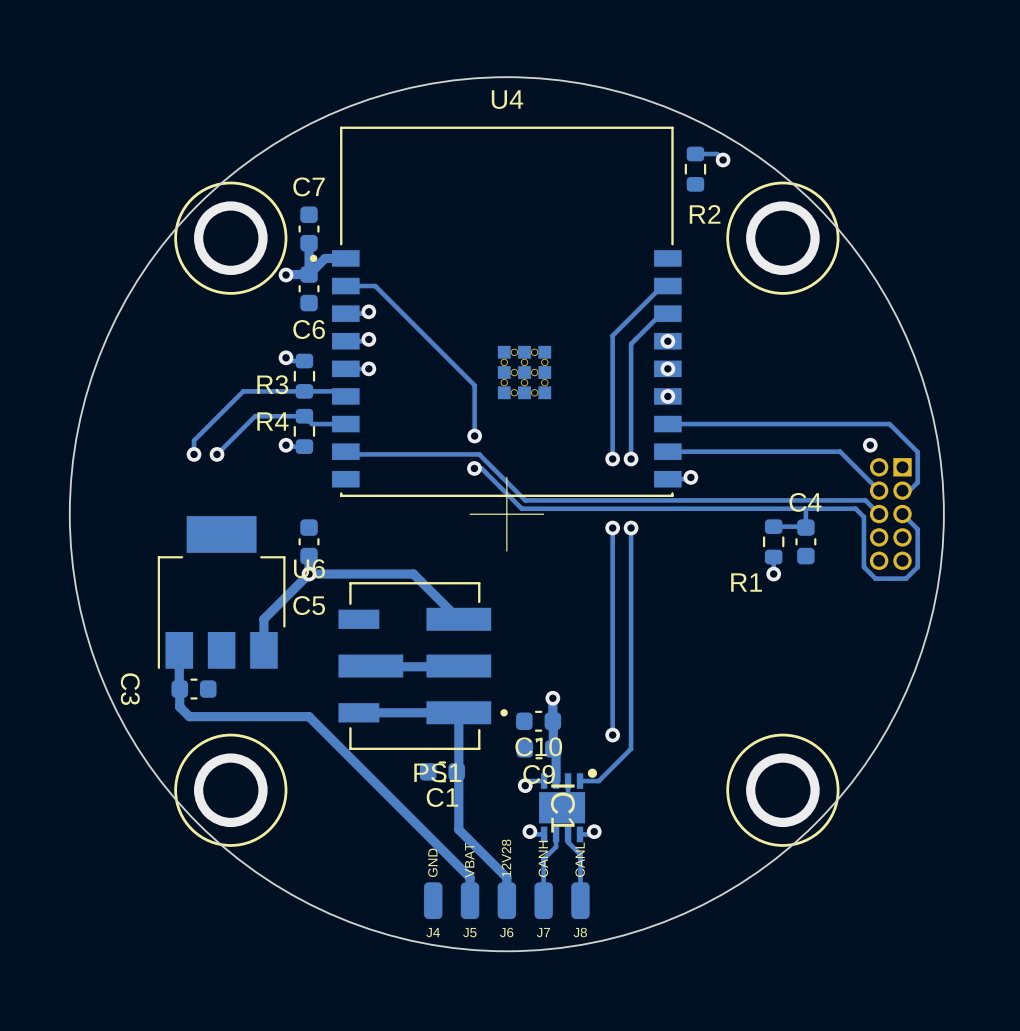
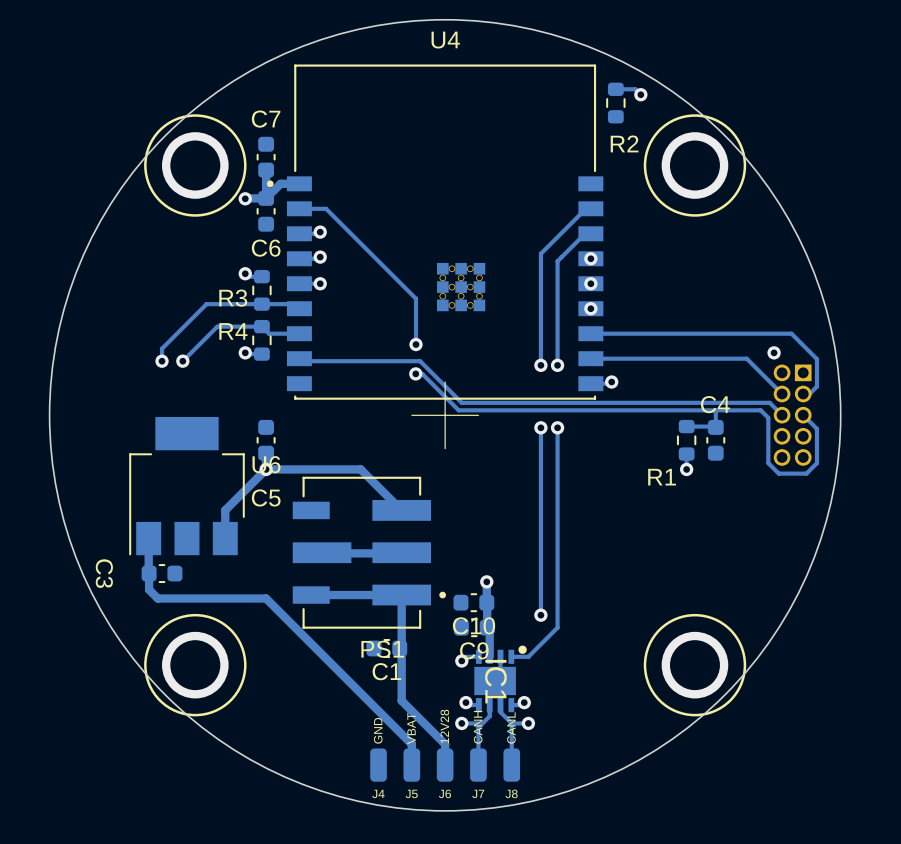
via: none -> (461, 723)
track: none -> (478, 723) (461, 723)
track: none -> (528, 723) (511, 723)
via: none -> (528, 723)

